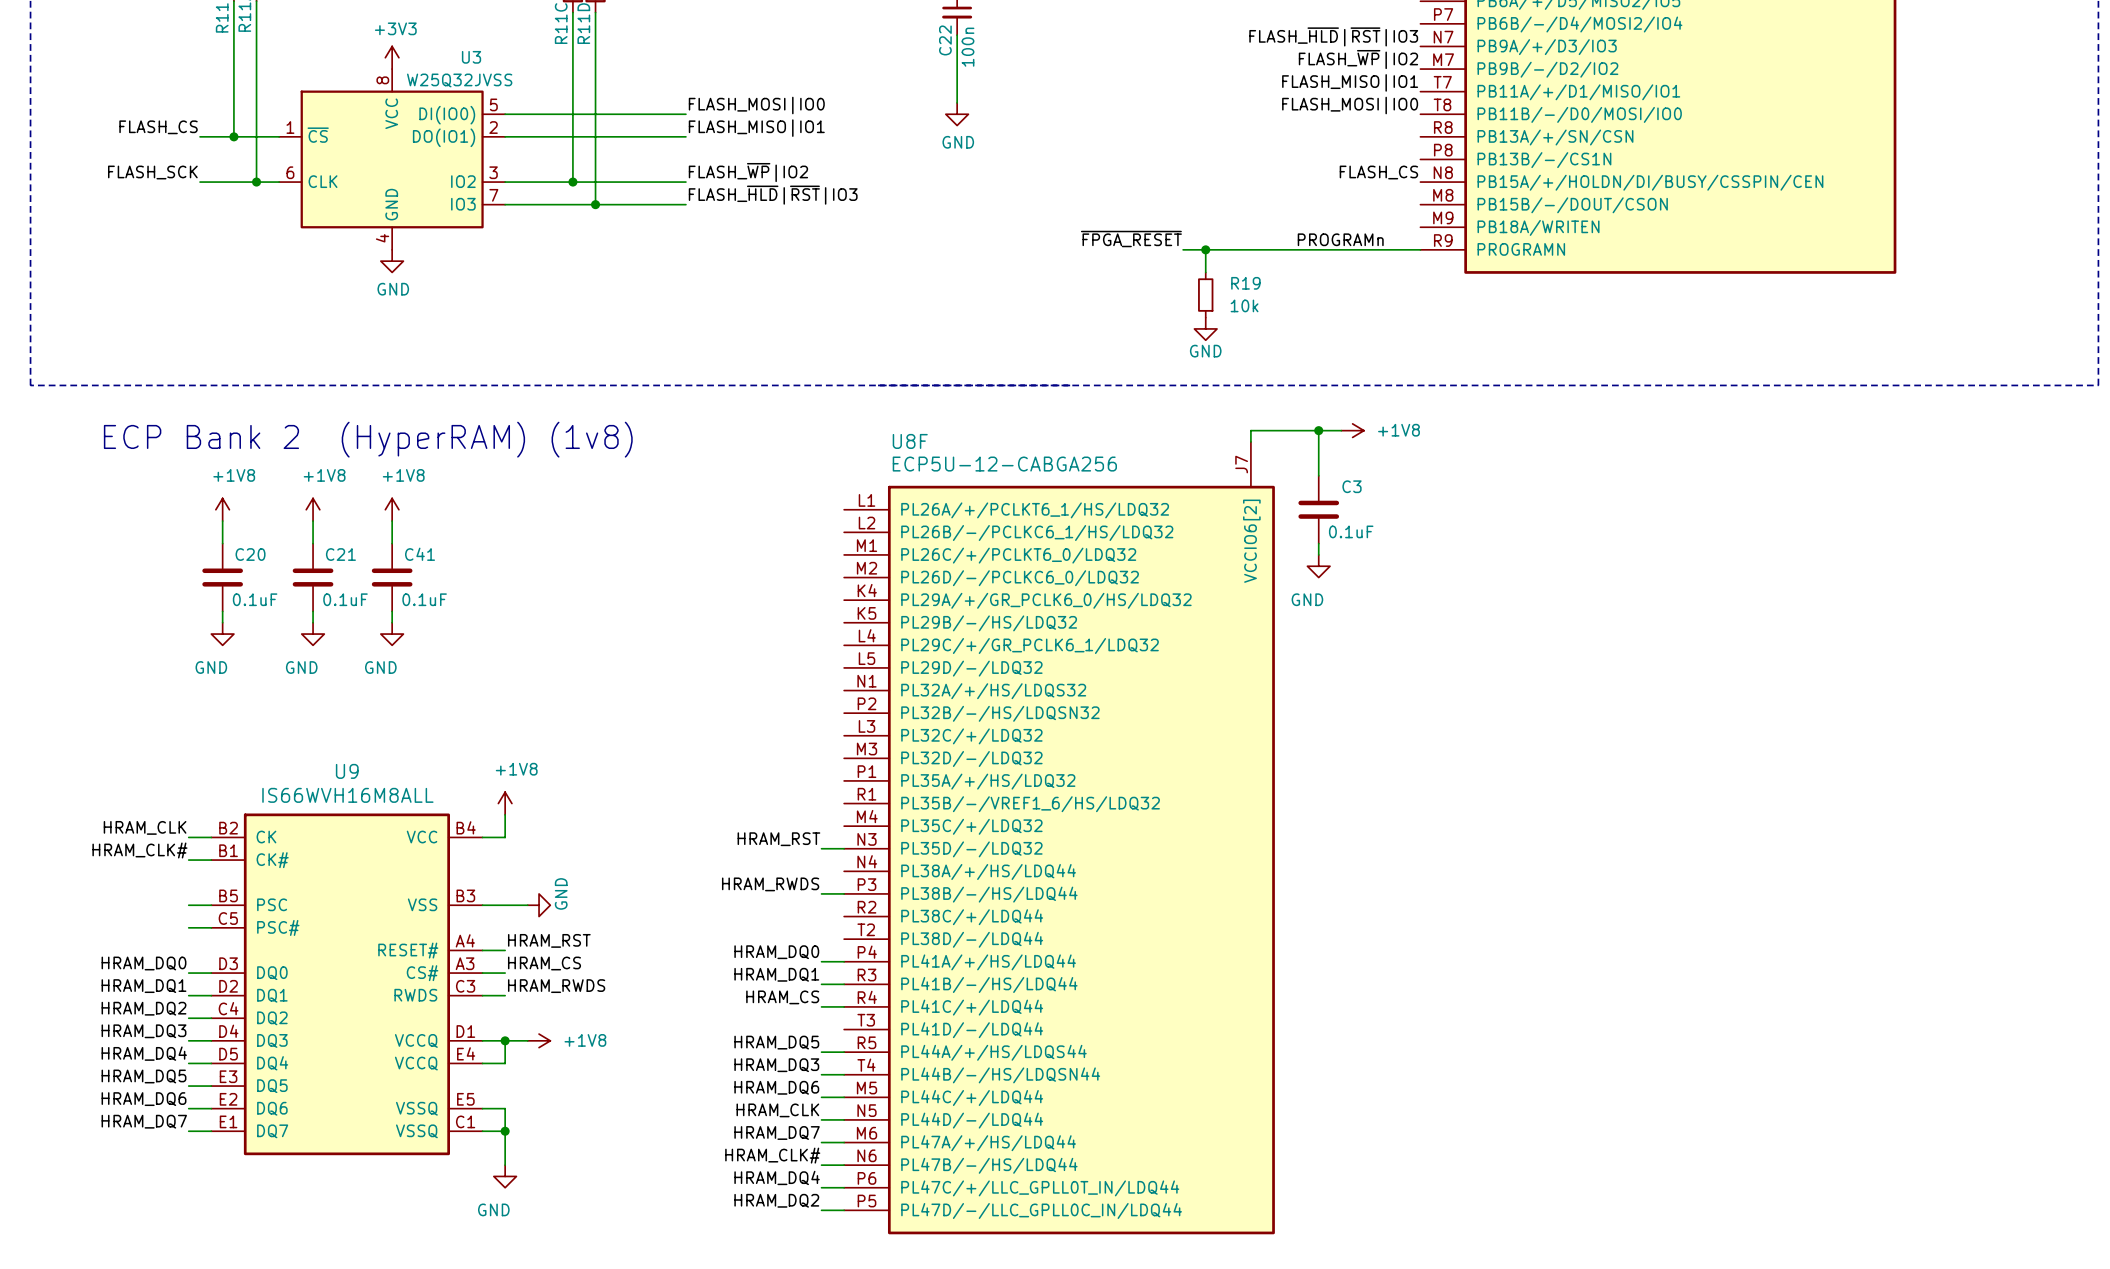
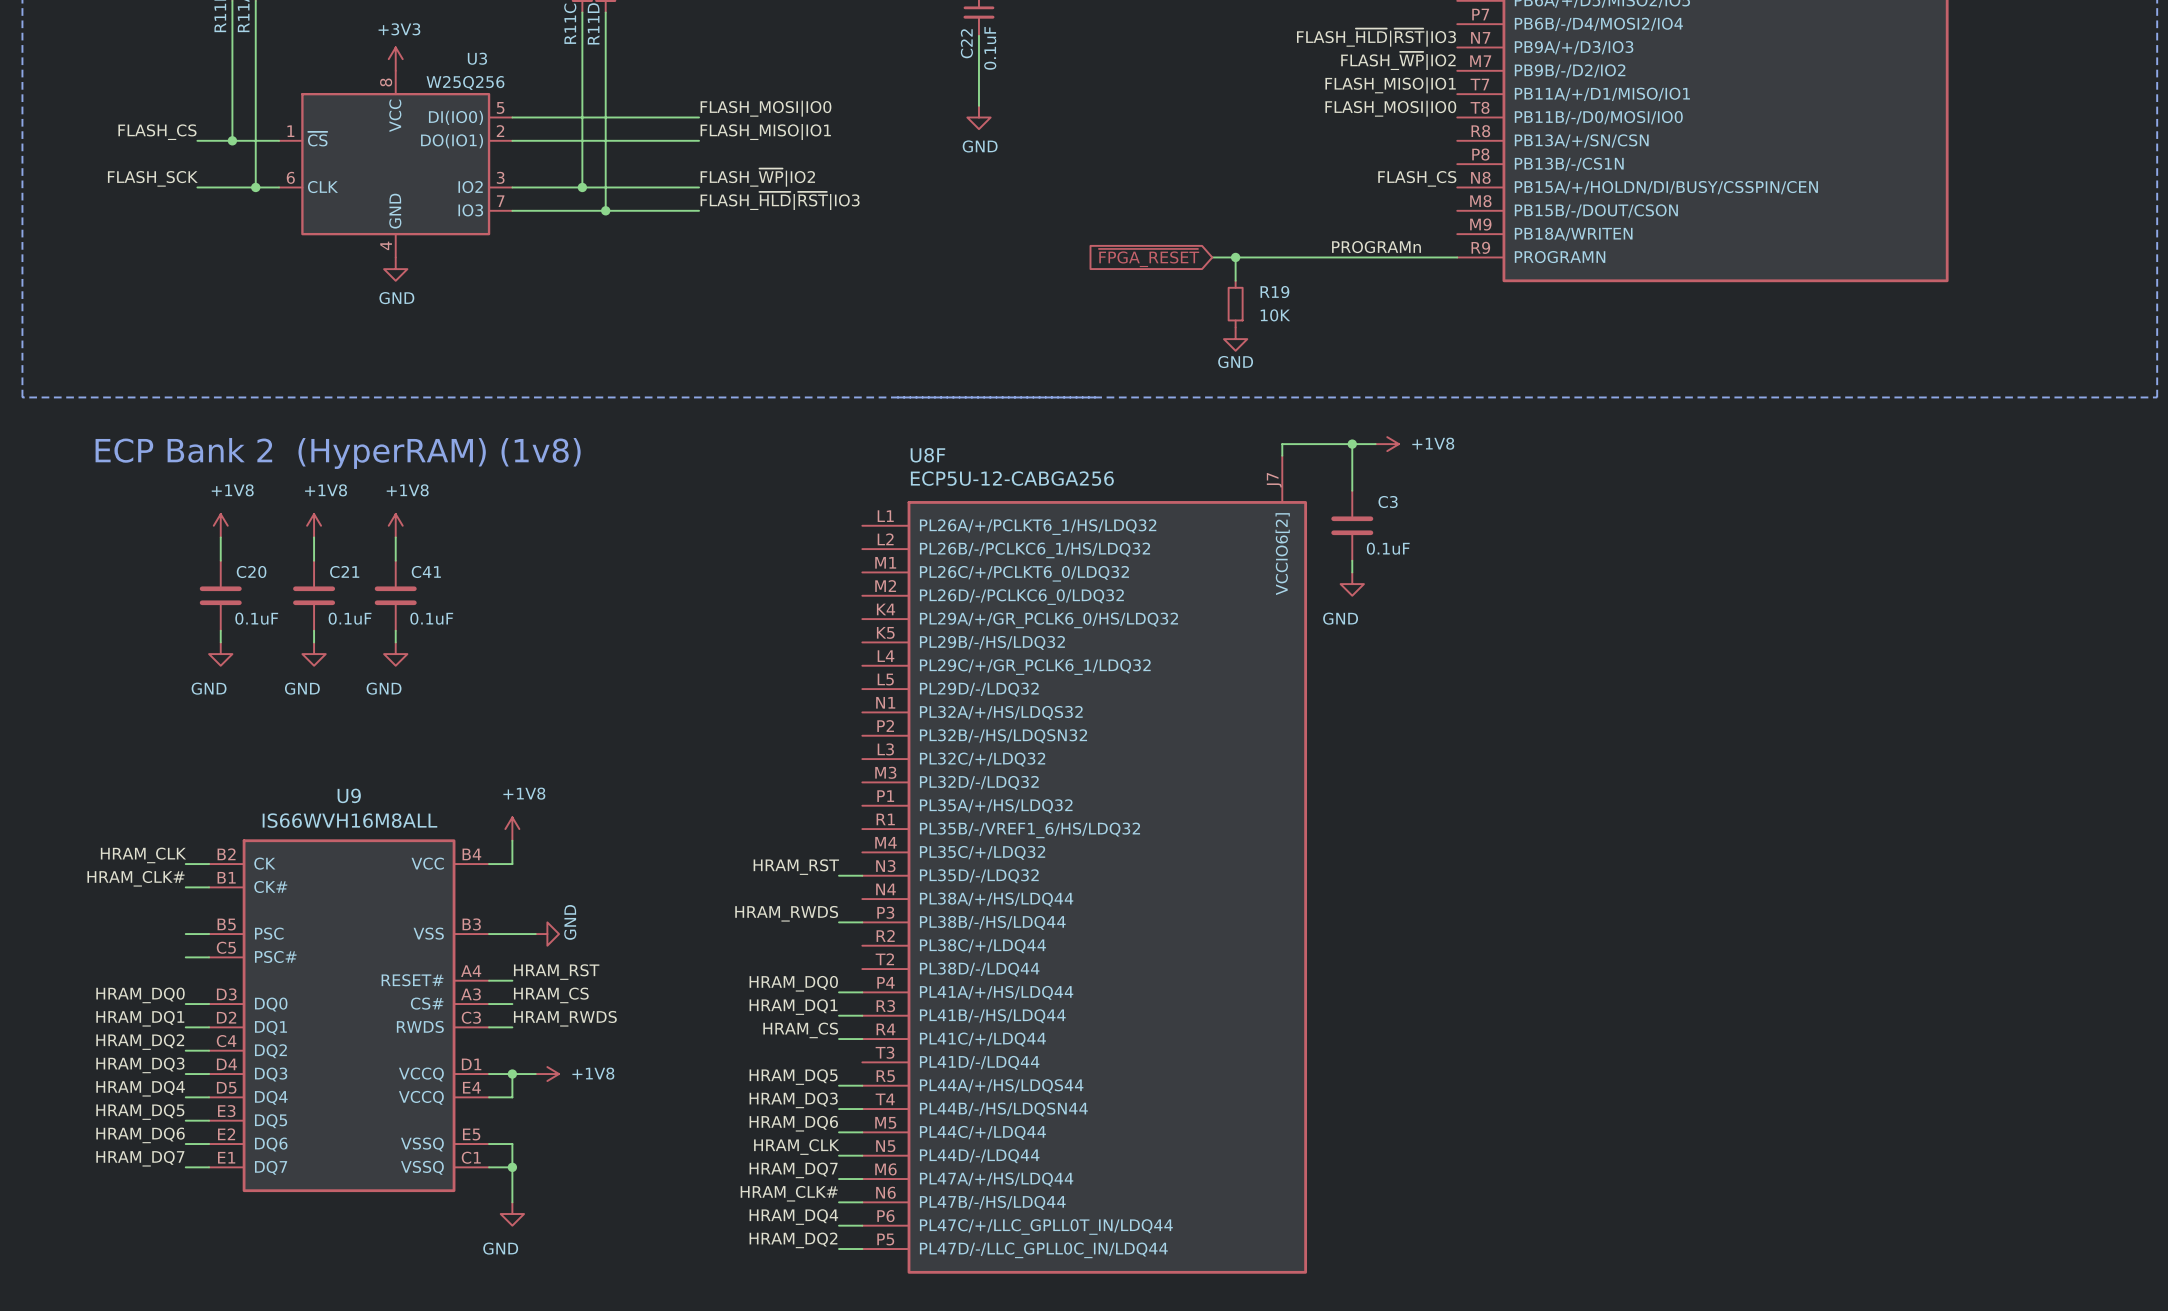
C22 value: 100n (968, 47) -> 0.1uF (990, 48)
U3 value: W25Q32JVSS (459, 80) -> W25Q256 (465, 82)
label: ~{FPGA_RESET} (1131, 239) -> none
global label: none -> ~{FPGA_RESET} (1149, 258)
R19 value: 10k (1244, 305) -> 10K (1275, 315)

